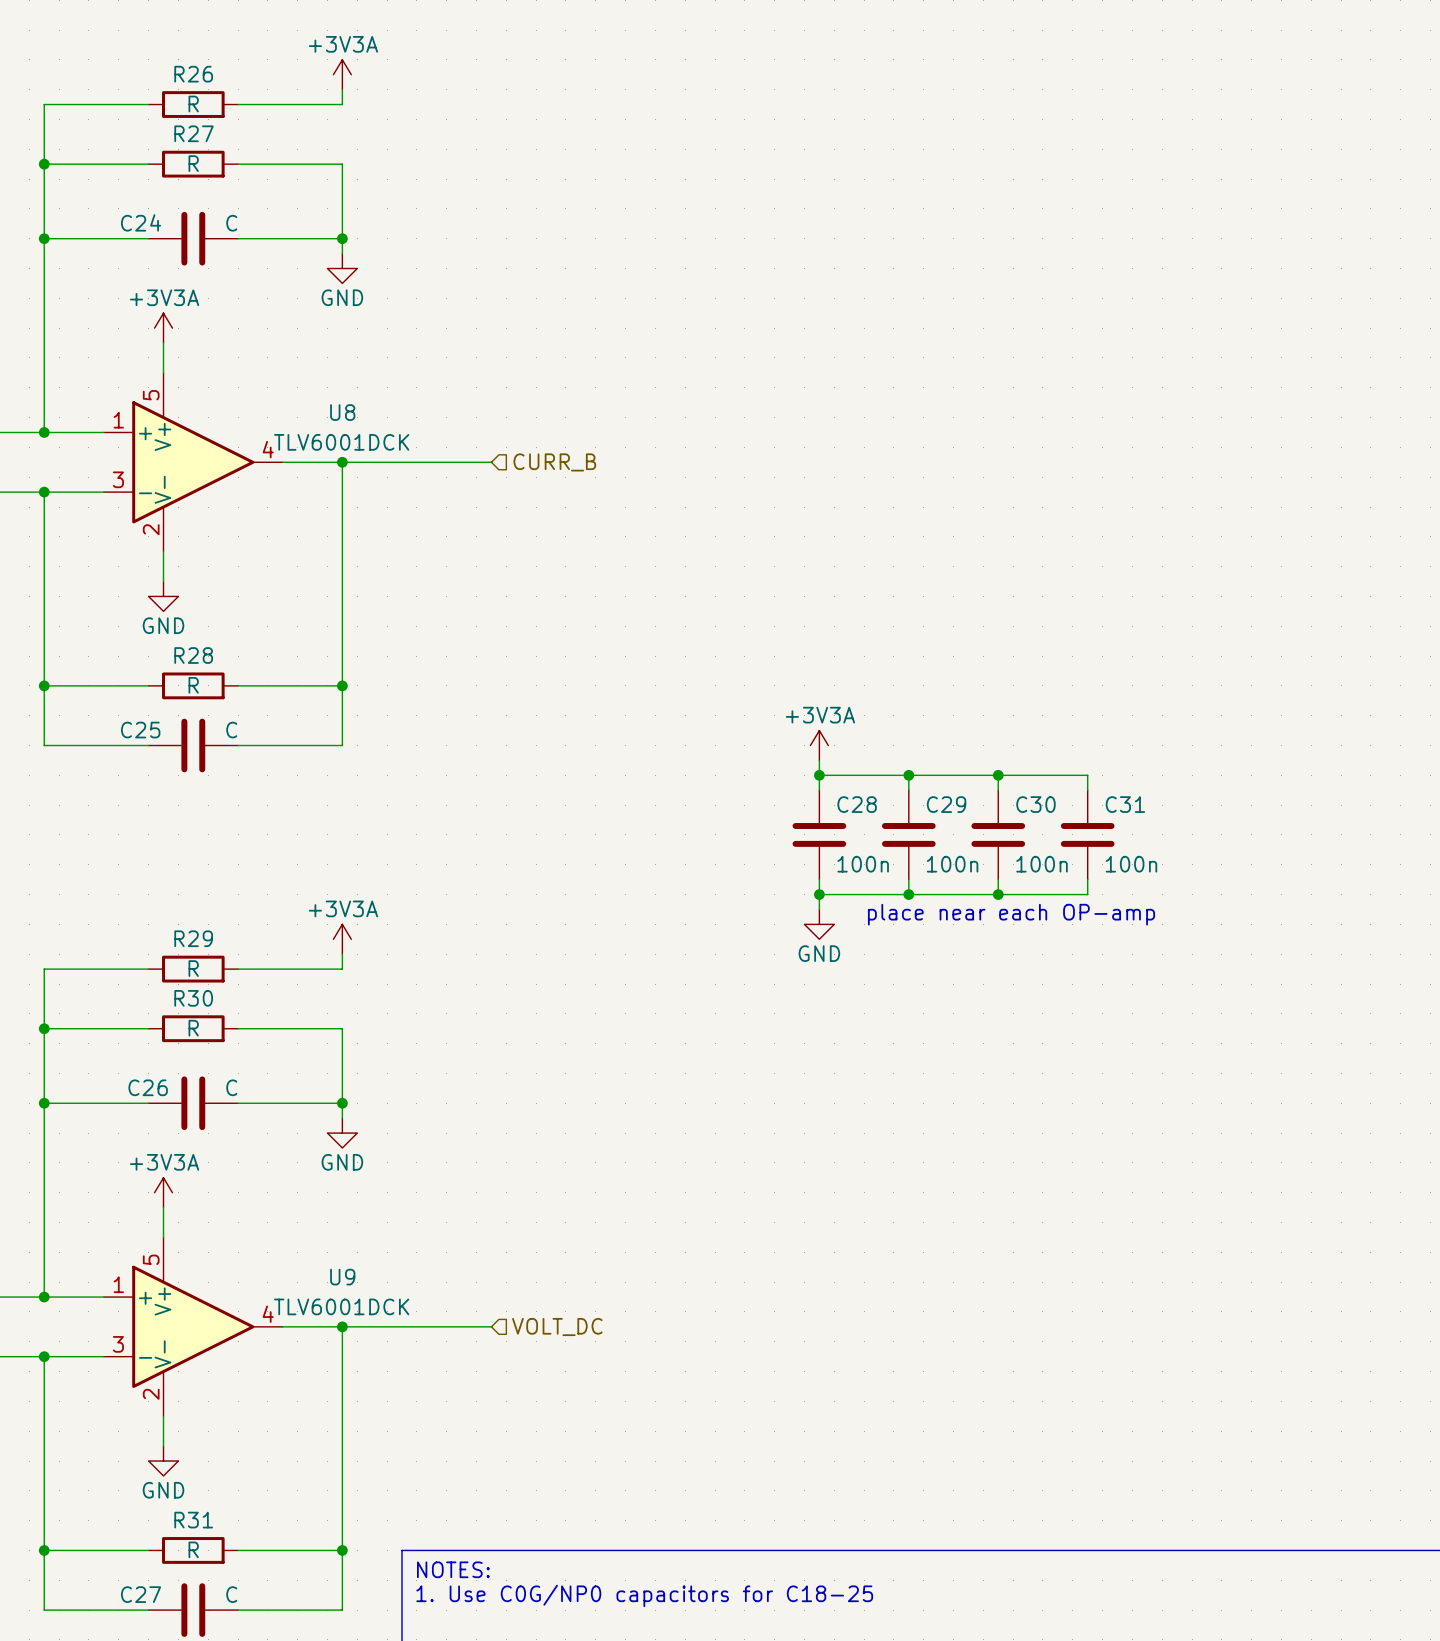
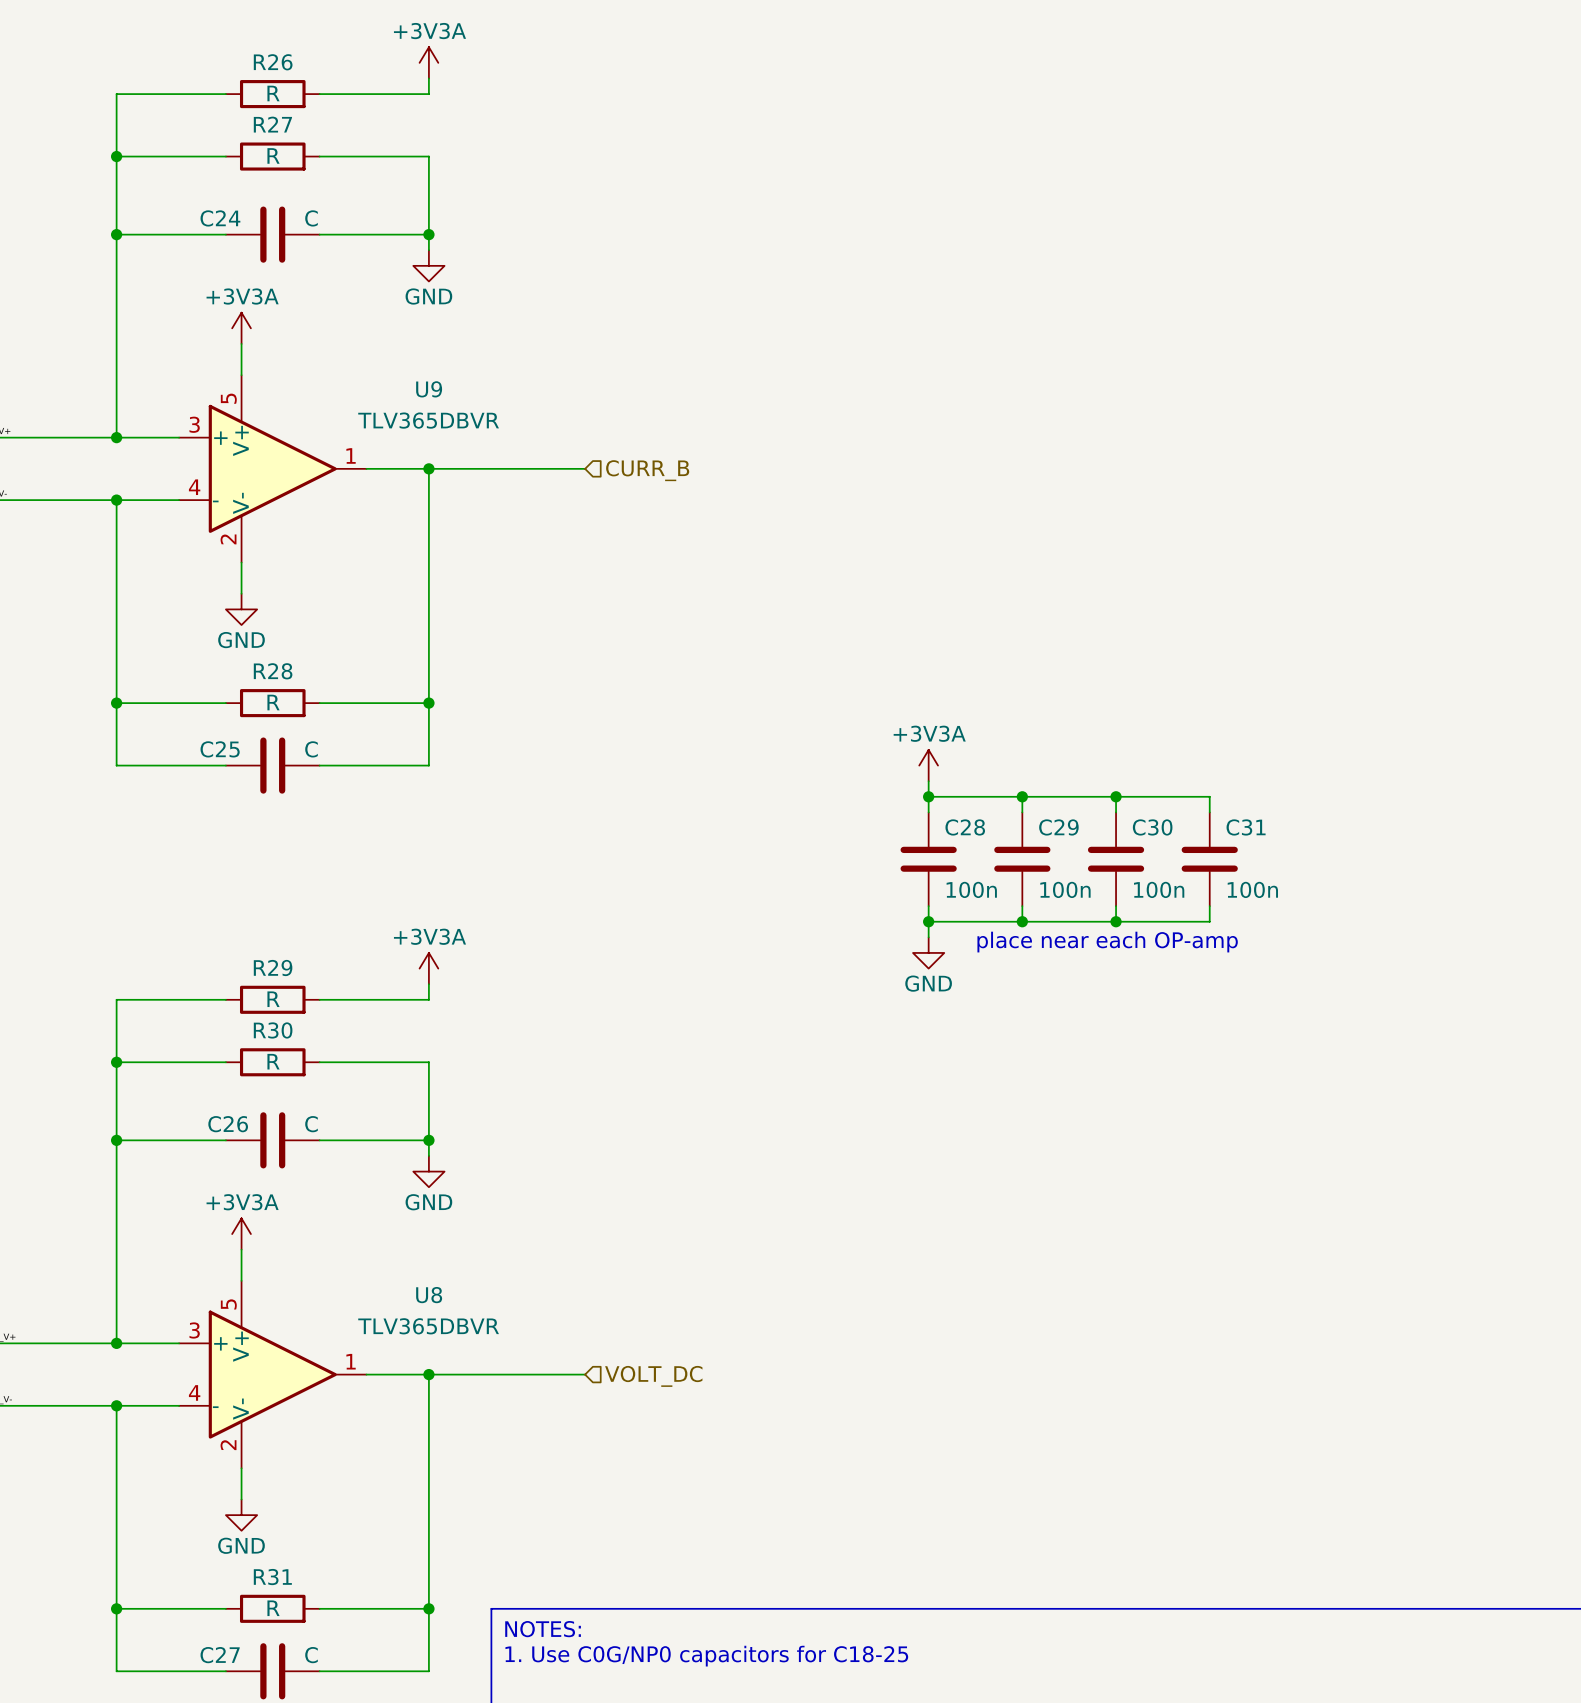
U8 name position: U8 (342, 412) -> U8 (429, 1295)
U8 pin number: 1 (118, 420) -> 3 (194, 1330)
U8 value: TLV6001DCK (341, 442) -> TLV365DBVR (428, 1326)
U8 pin number: 4 (268, 449) -> 1 (351, 1361)
U8 position: (193, 462) -> (272, 1374)
U8 pin number: 3 (118, 479) -> 4 (194, 1392)
U9 name position: U9 (342, 1277) -> U9 (429, 389)
U9 pin number: 1 (118, 1284) -> 3 (194, 424)
U9 value: TLV6001DCK (341, 1306) -> TLV365DBVR (428, 420)
U9 pin number: 4 (268, 1314) -> 1 (351, 455)
U9 position: (193, 1326) -> (272, 468)
U9 pin number: 3 (118, 1344) -> 4 (194, 487)

